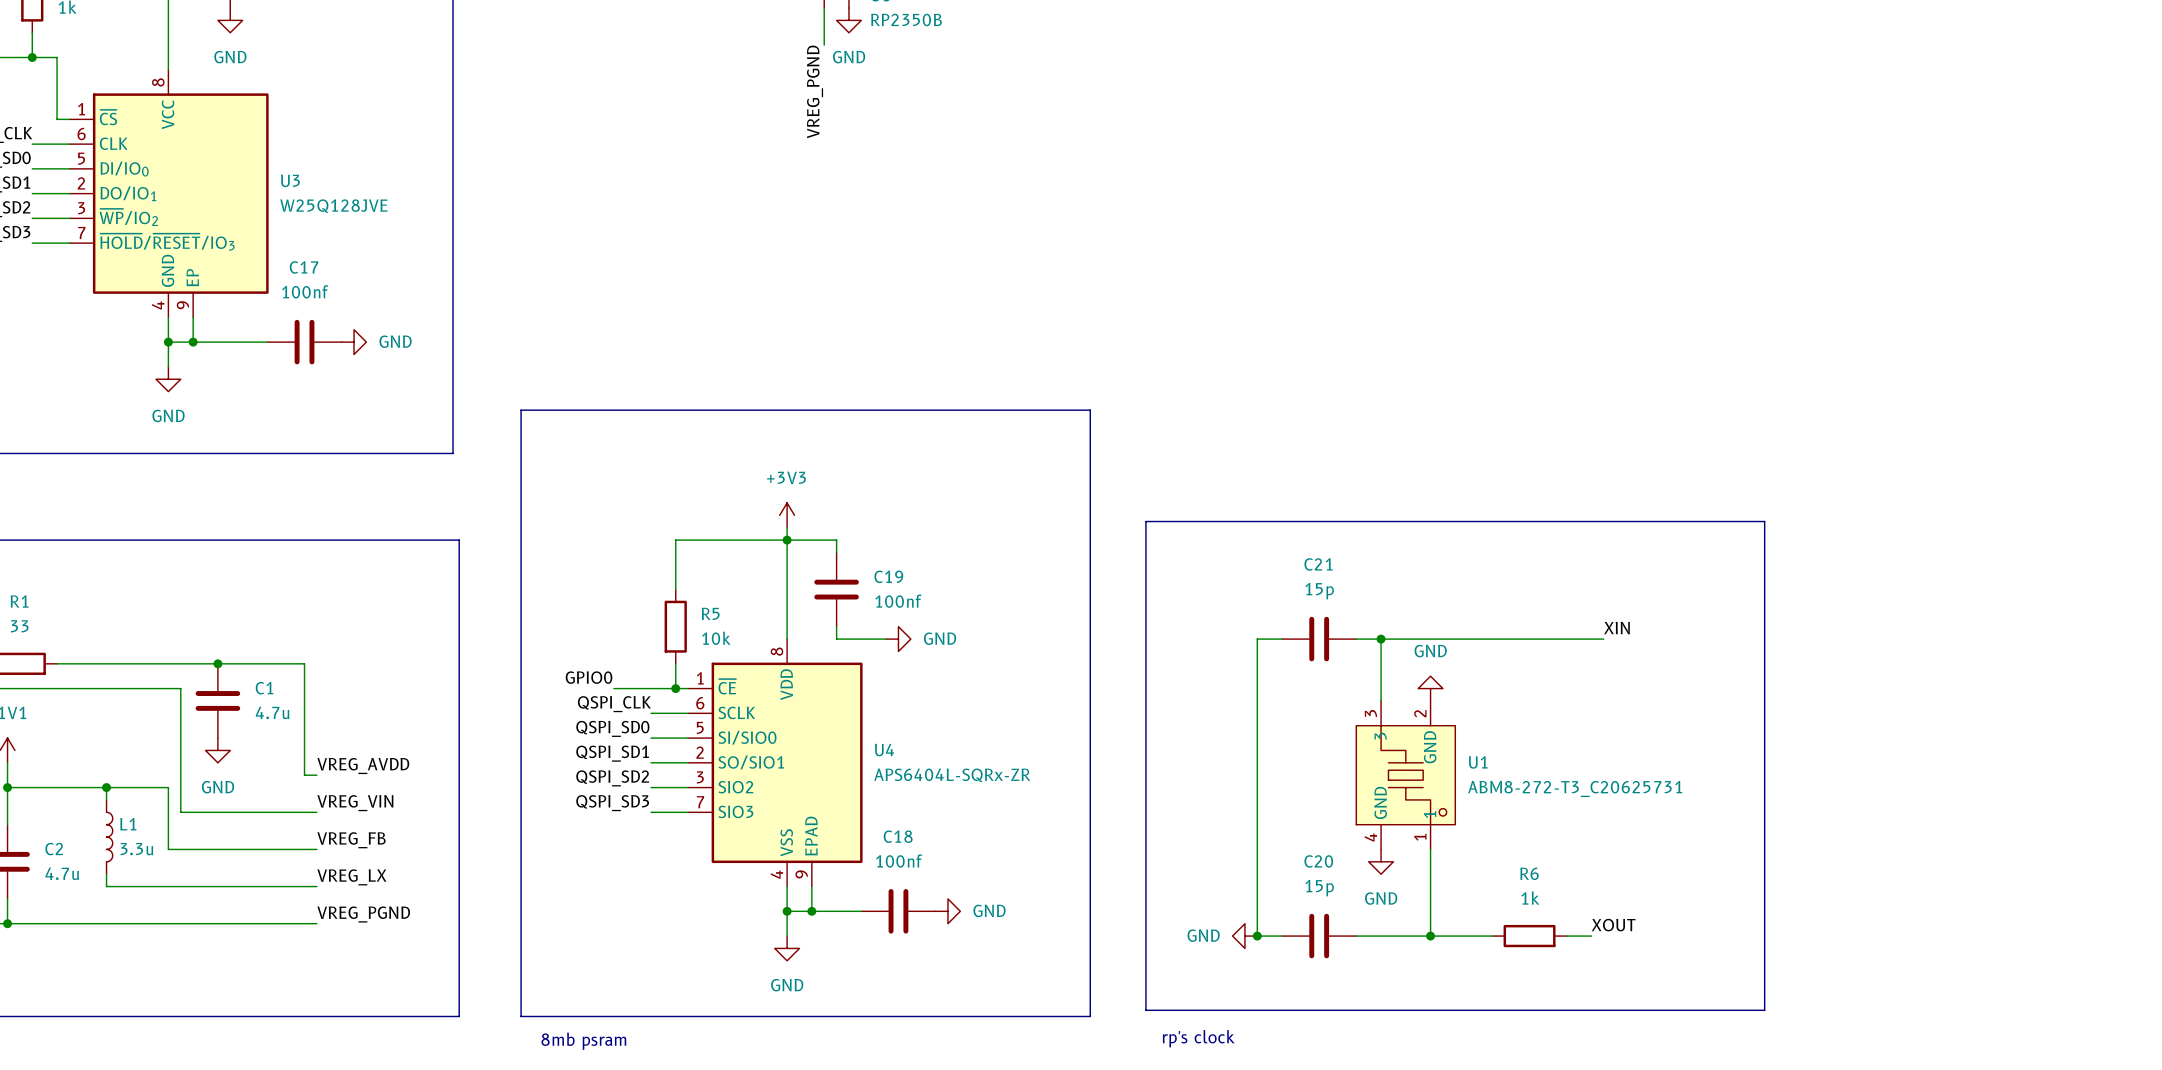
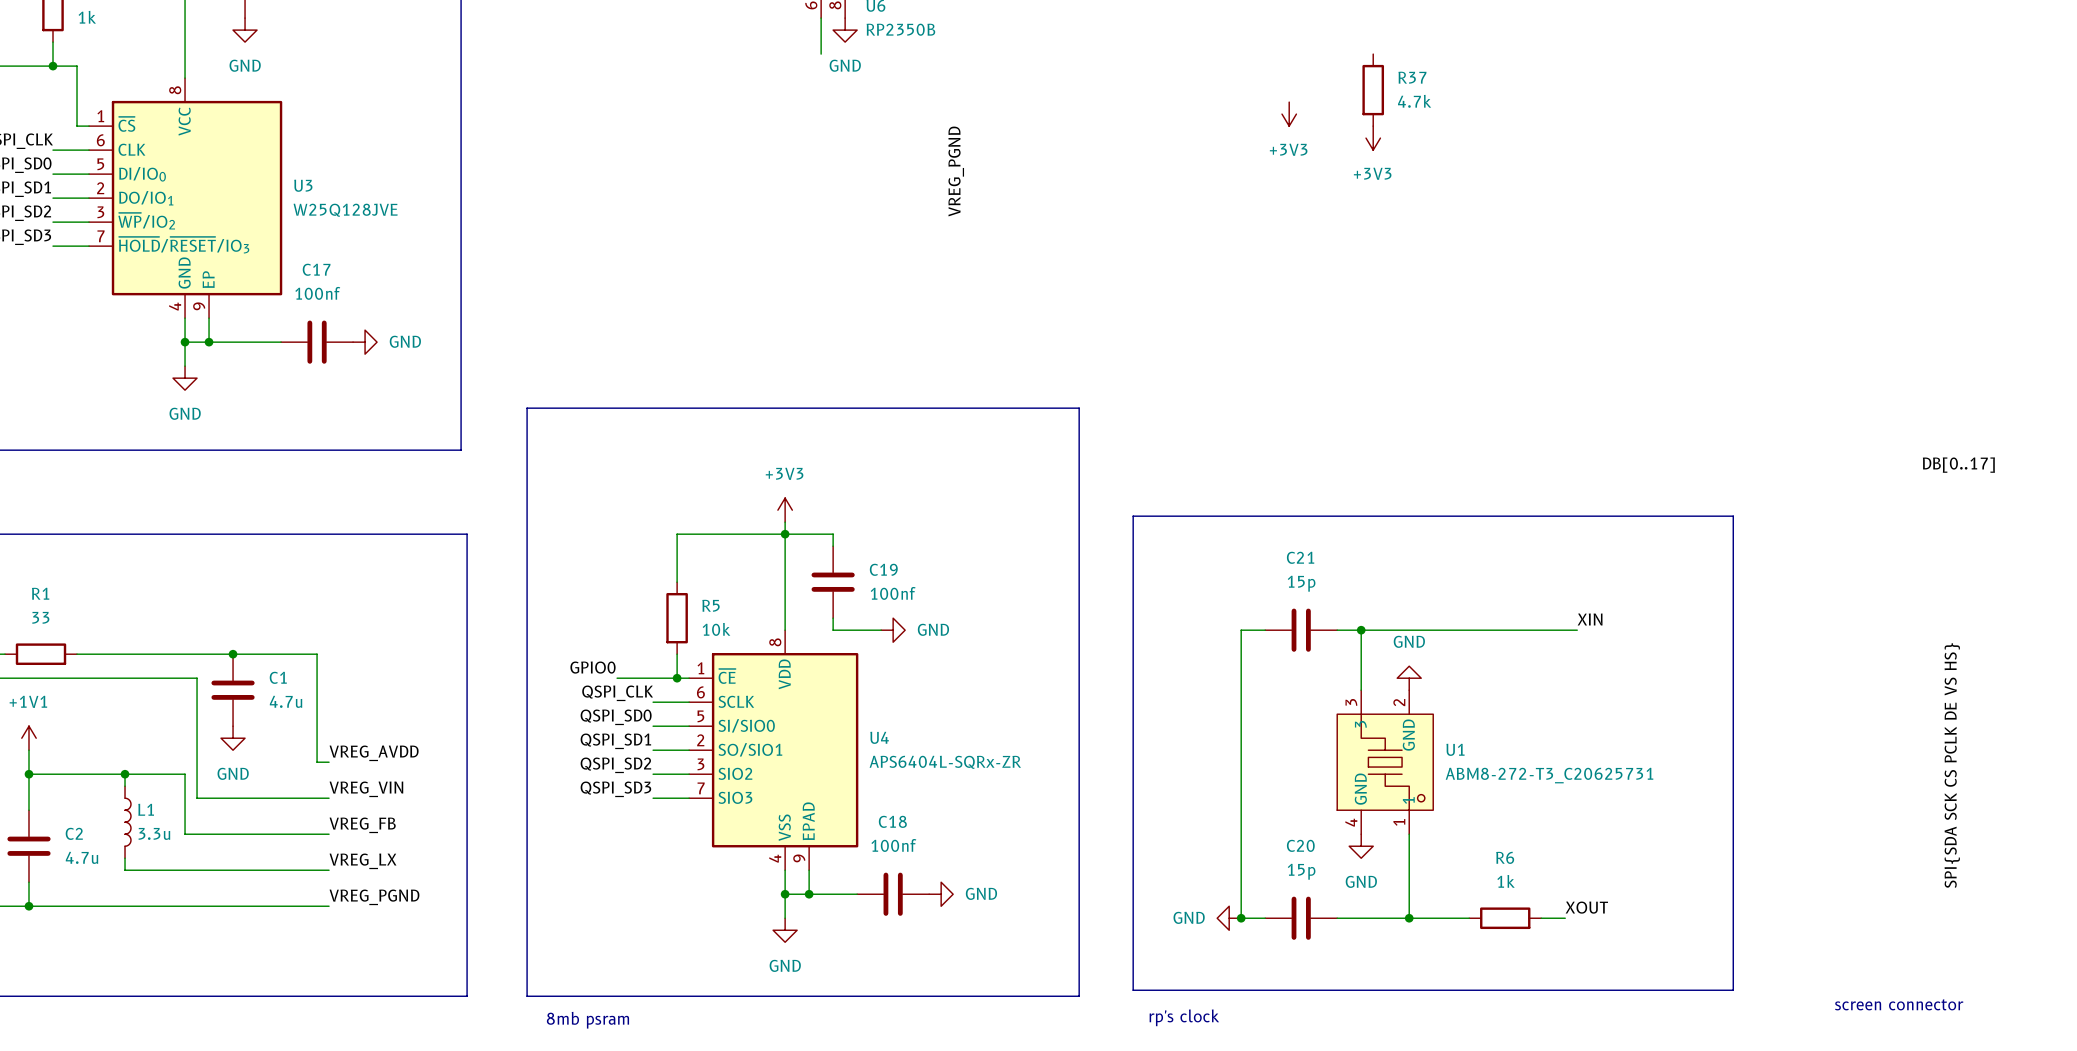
R37: none -> 4.7k (1373, 90)
label position: VREG_PGND (815, 91) -> VREG_PGND (956, 171)
power symbol: none -> +3V3 (1289, 114)
power symbol: none -> +3V3 (1373, 138)
label: none -> DB[0..17] (1958, 465)
label: none -> SPI{SDA SCK CS PCLK DE VS HS} (1952, 765)
text: none -> screen connector (1899, 1004)

